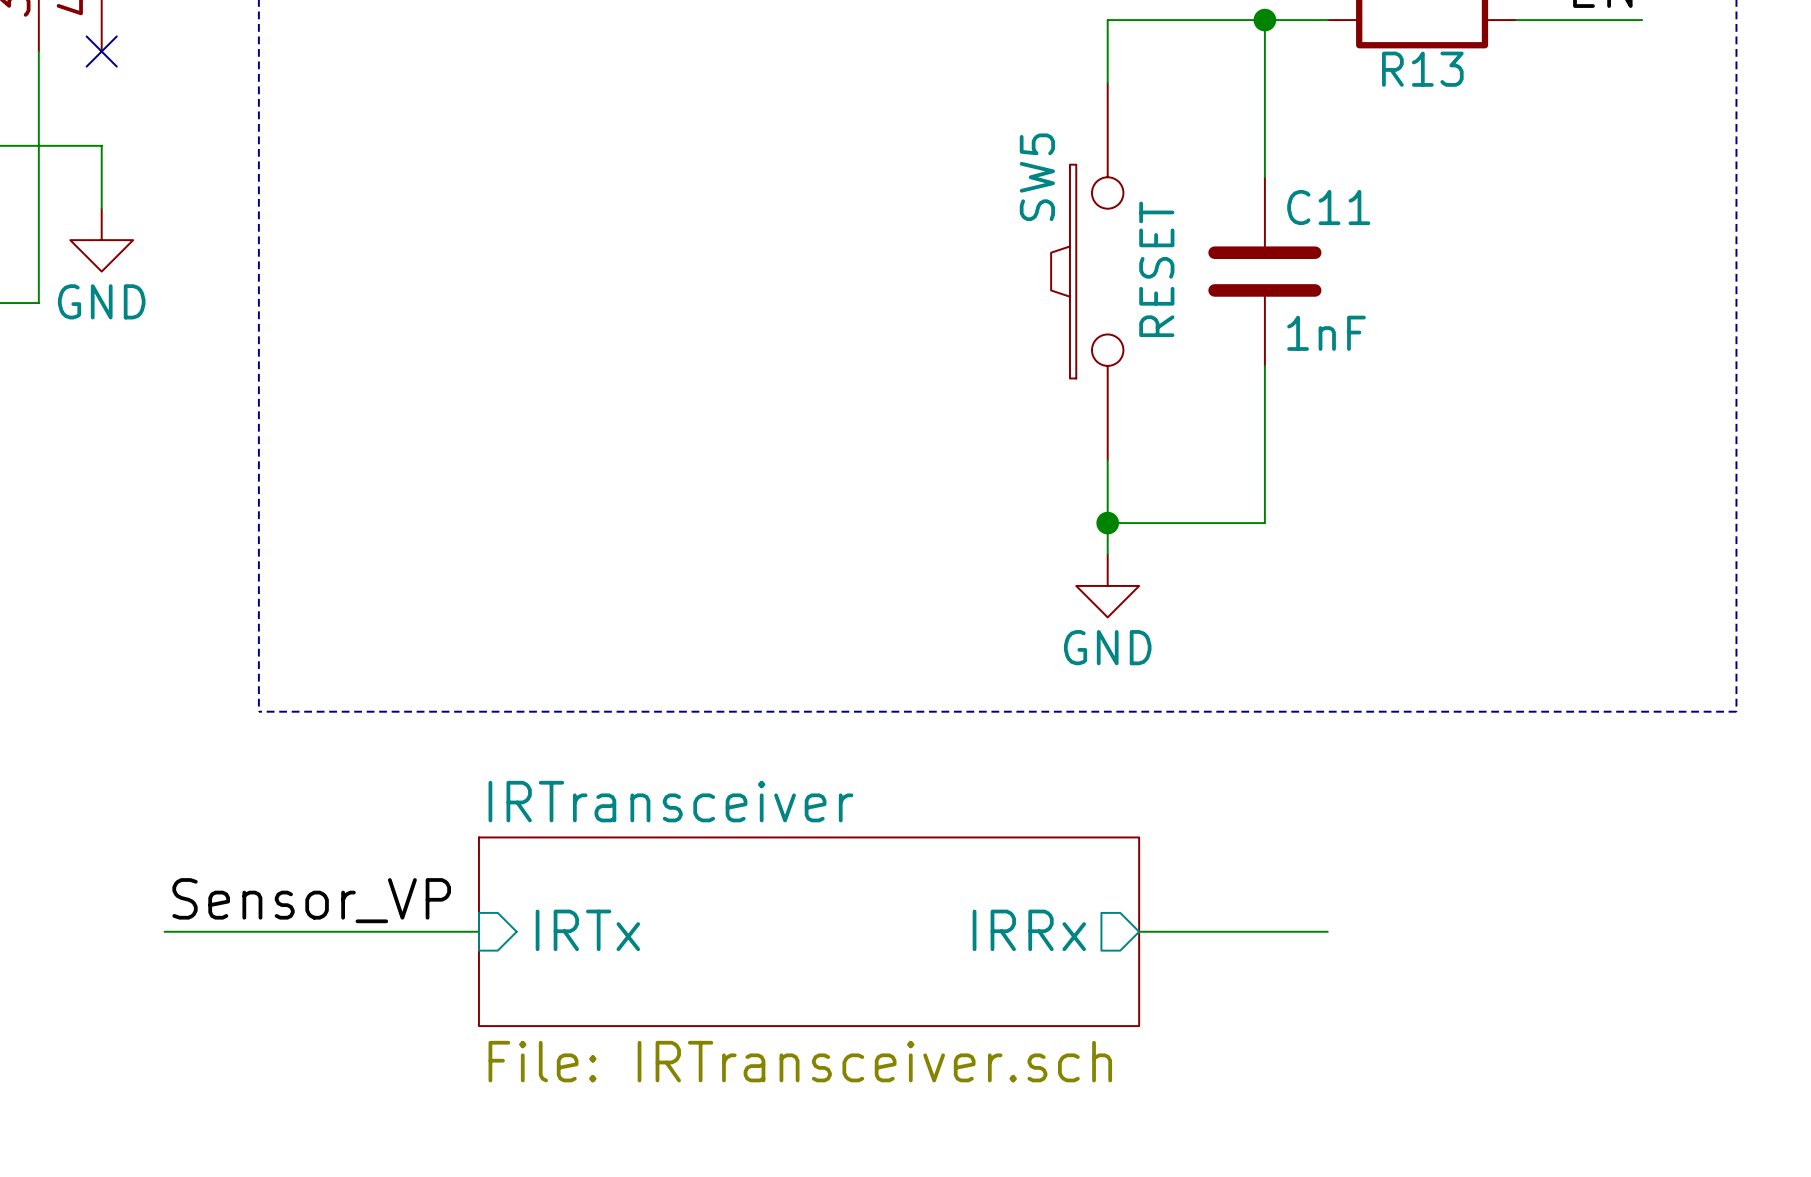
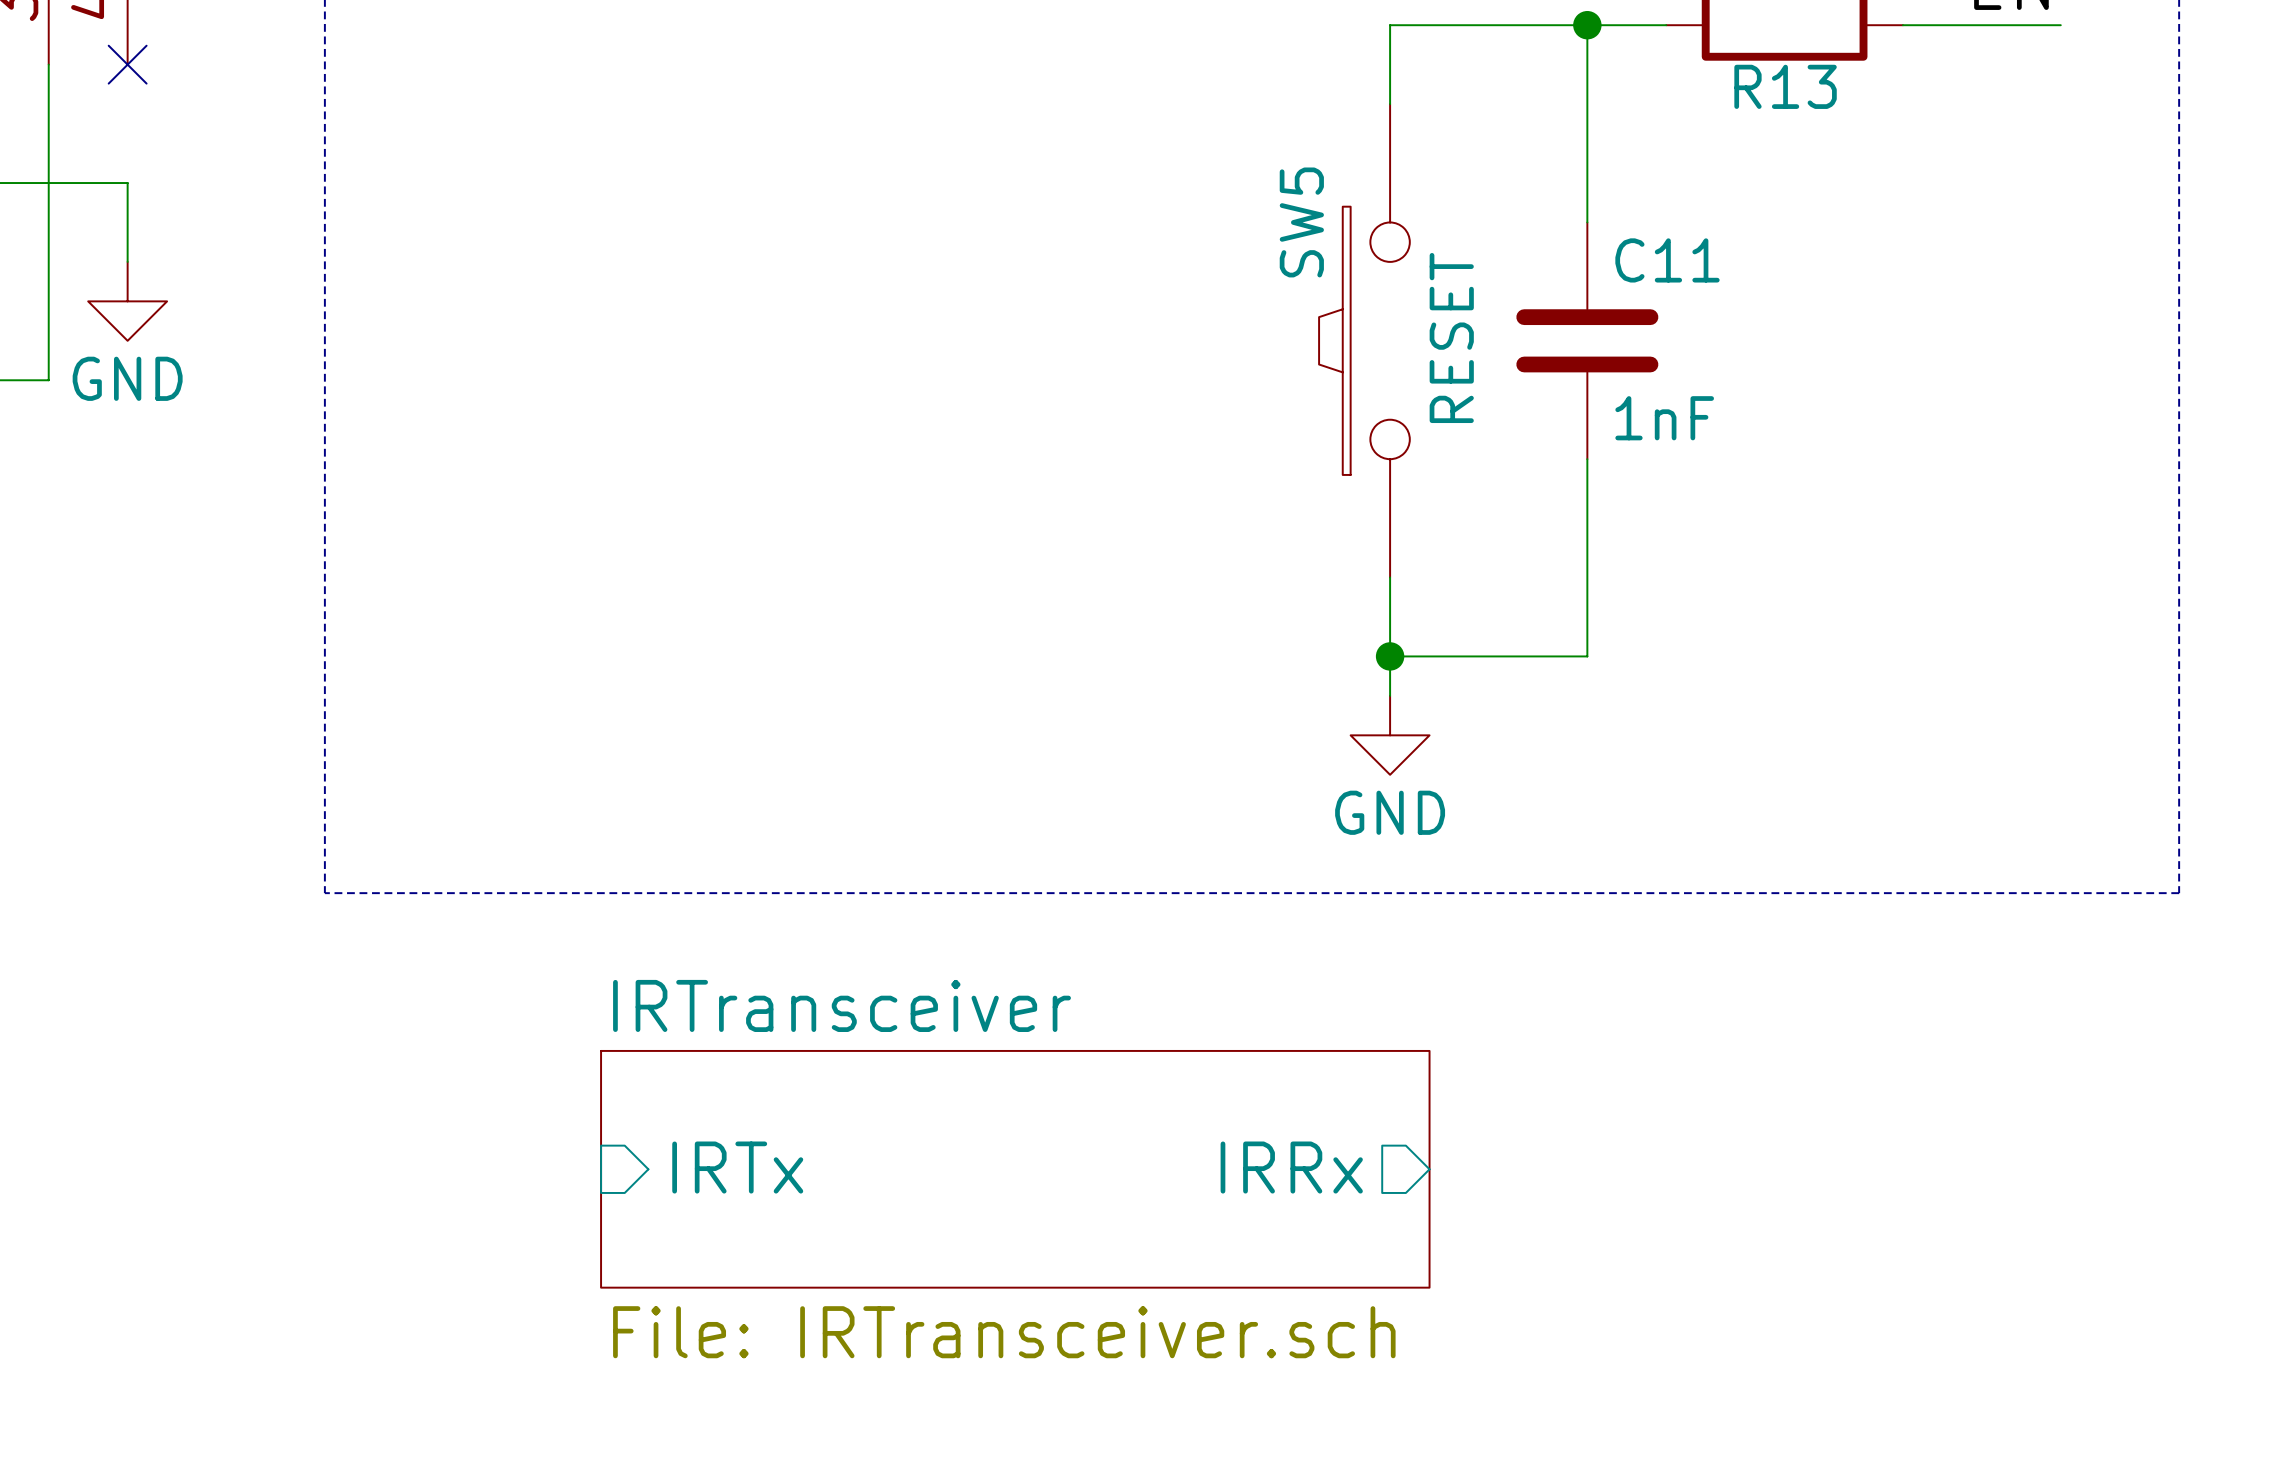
label: Sensor_VP (311, 900) -> none
wire: (164, 931) (478, 931) -> none
wire: (1139, 931) (1327, 931) -> none

